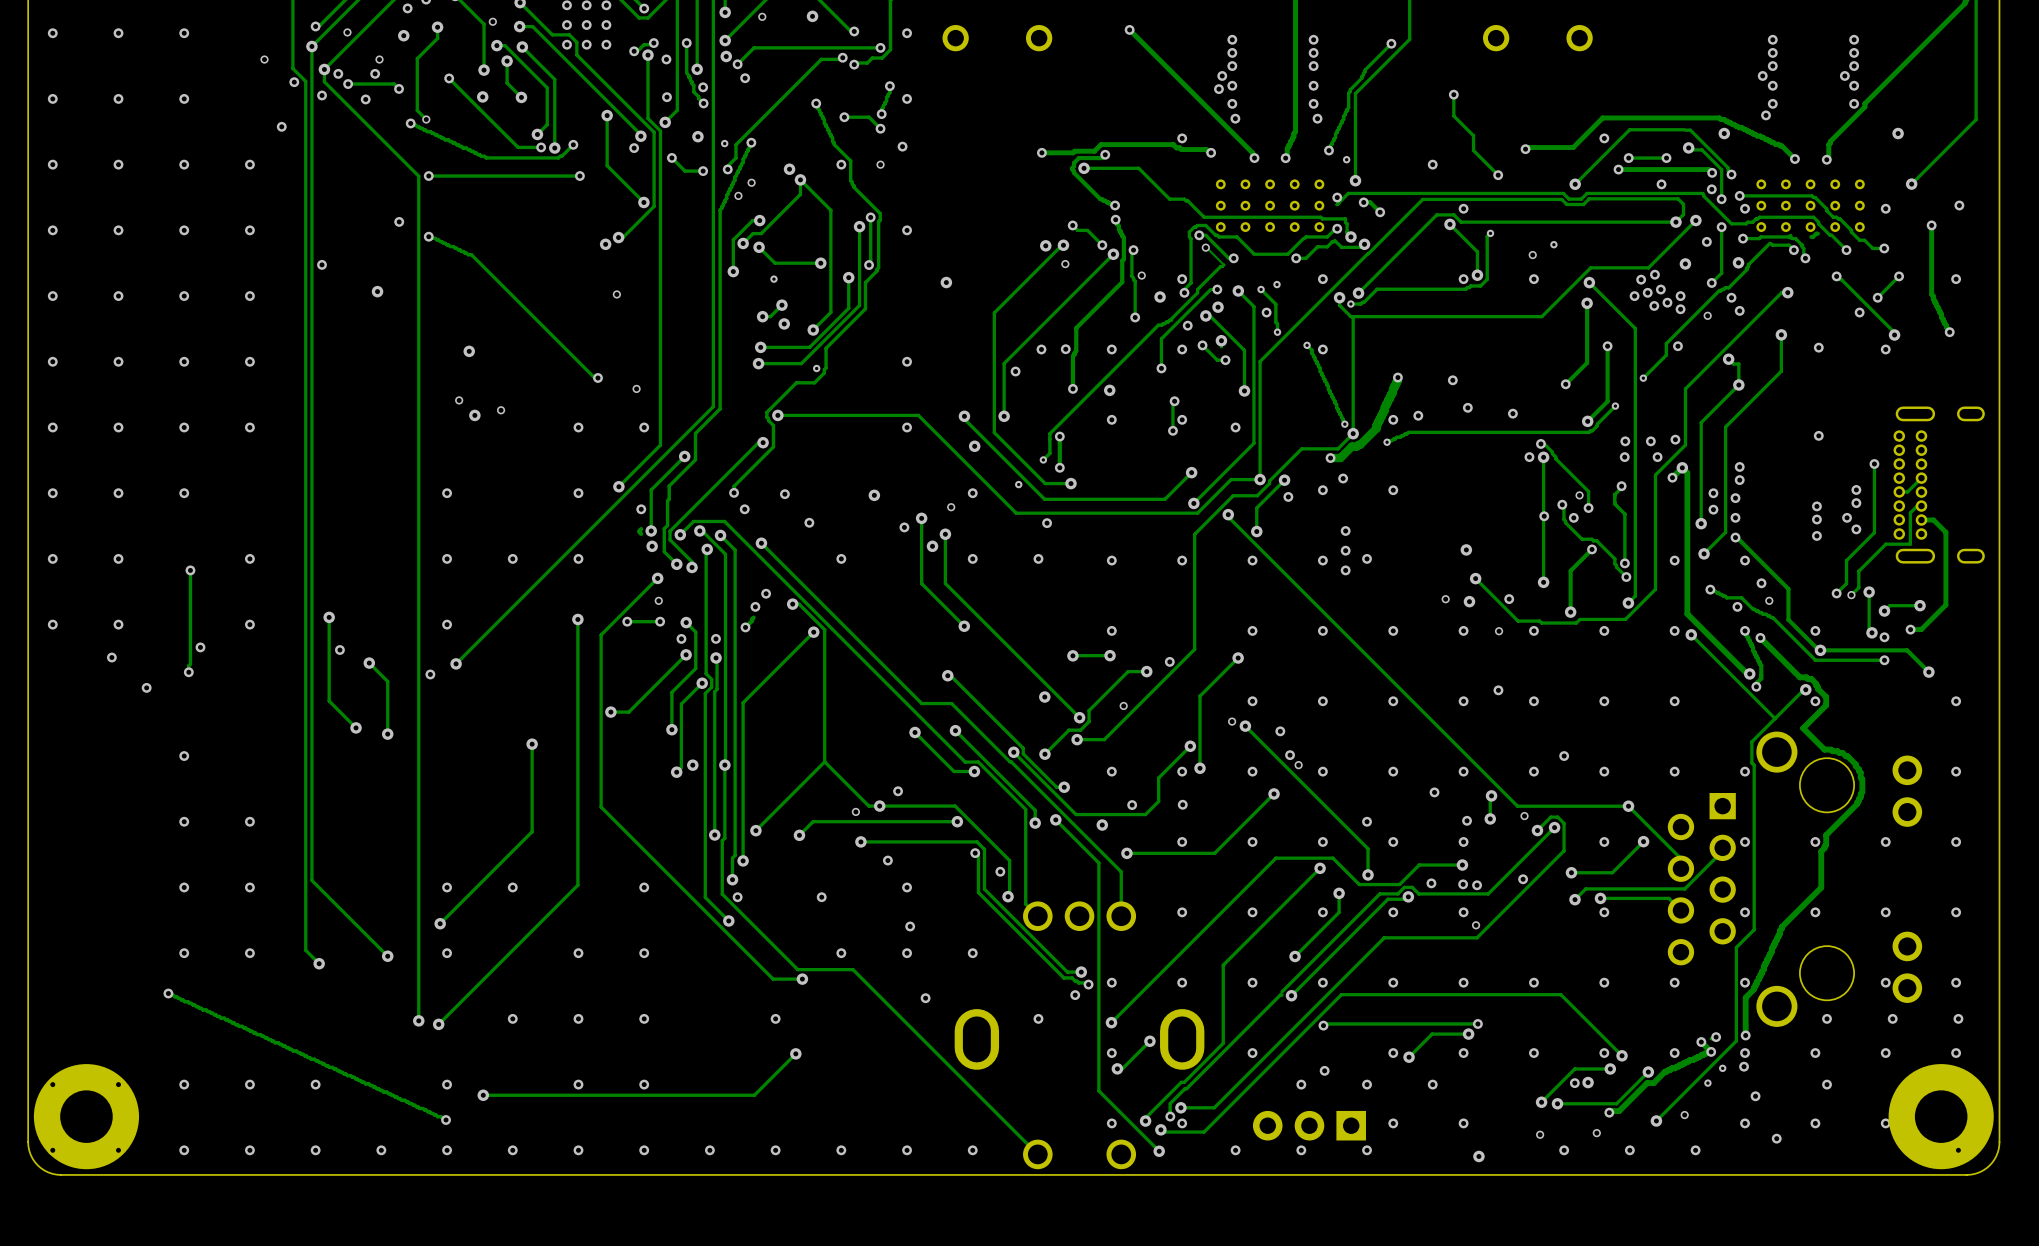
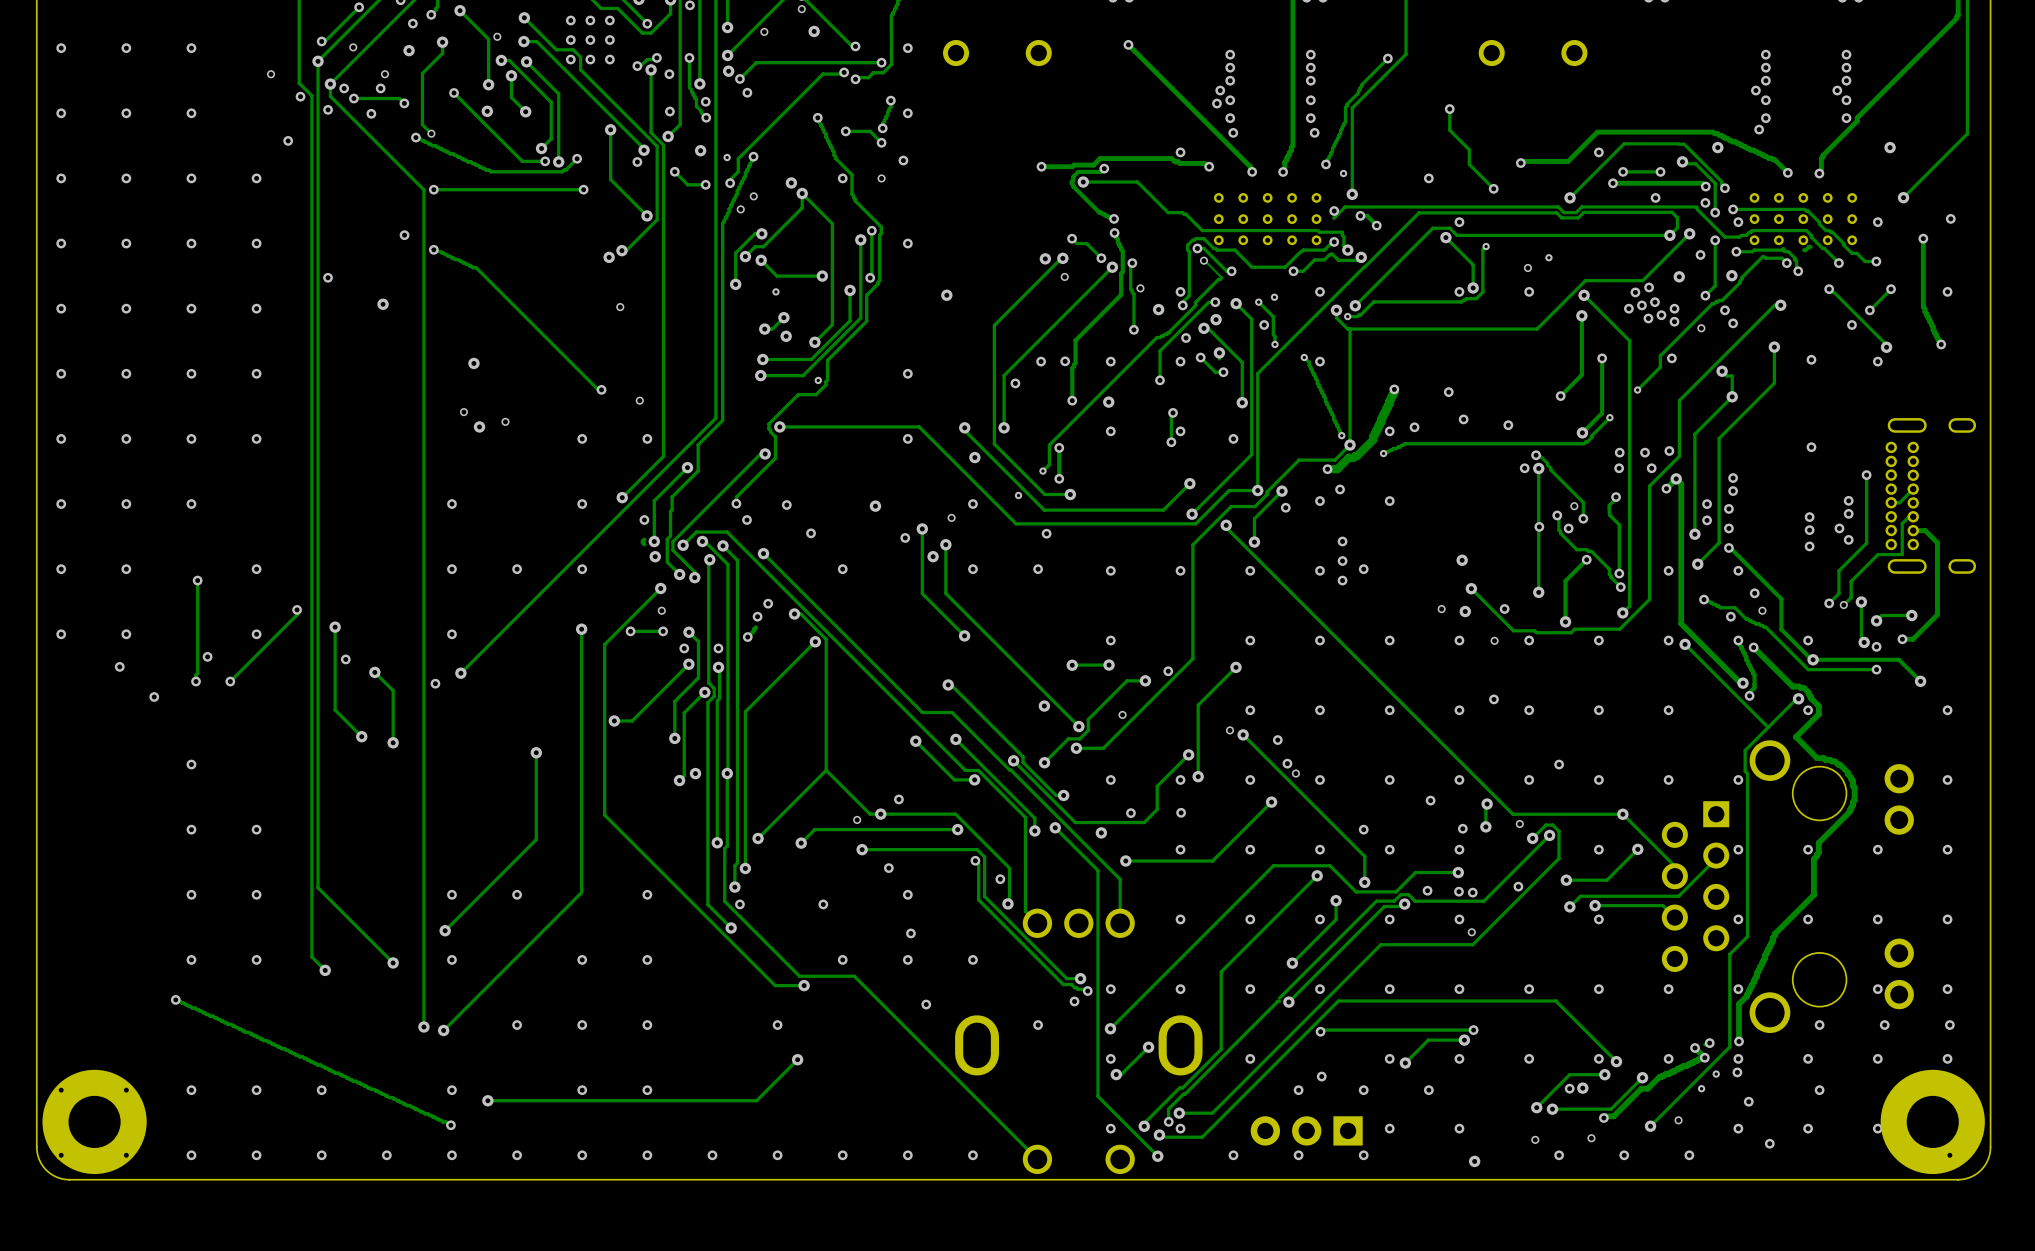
track: none -> (297, 609) (297, 614) (230, 681)
via: none -> (297, 609)
via: none -> (230, 681)

